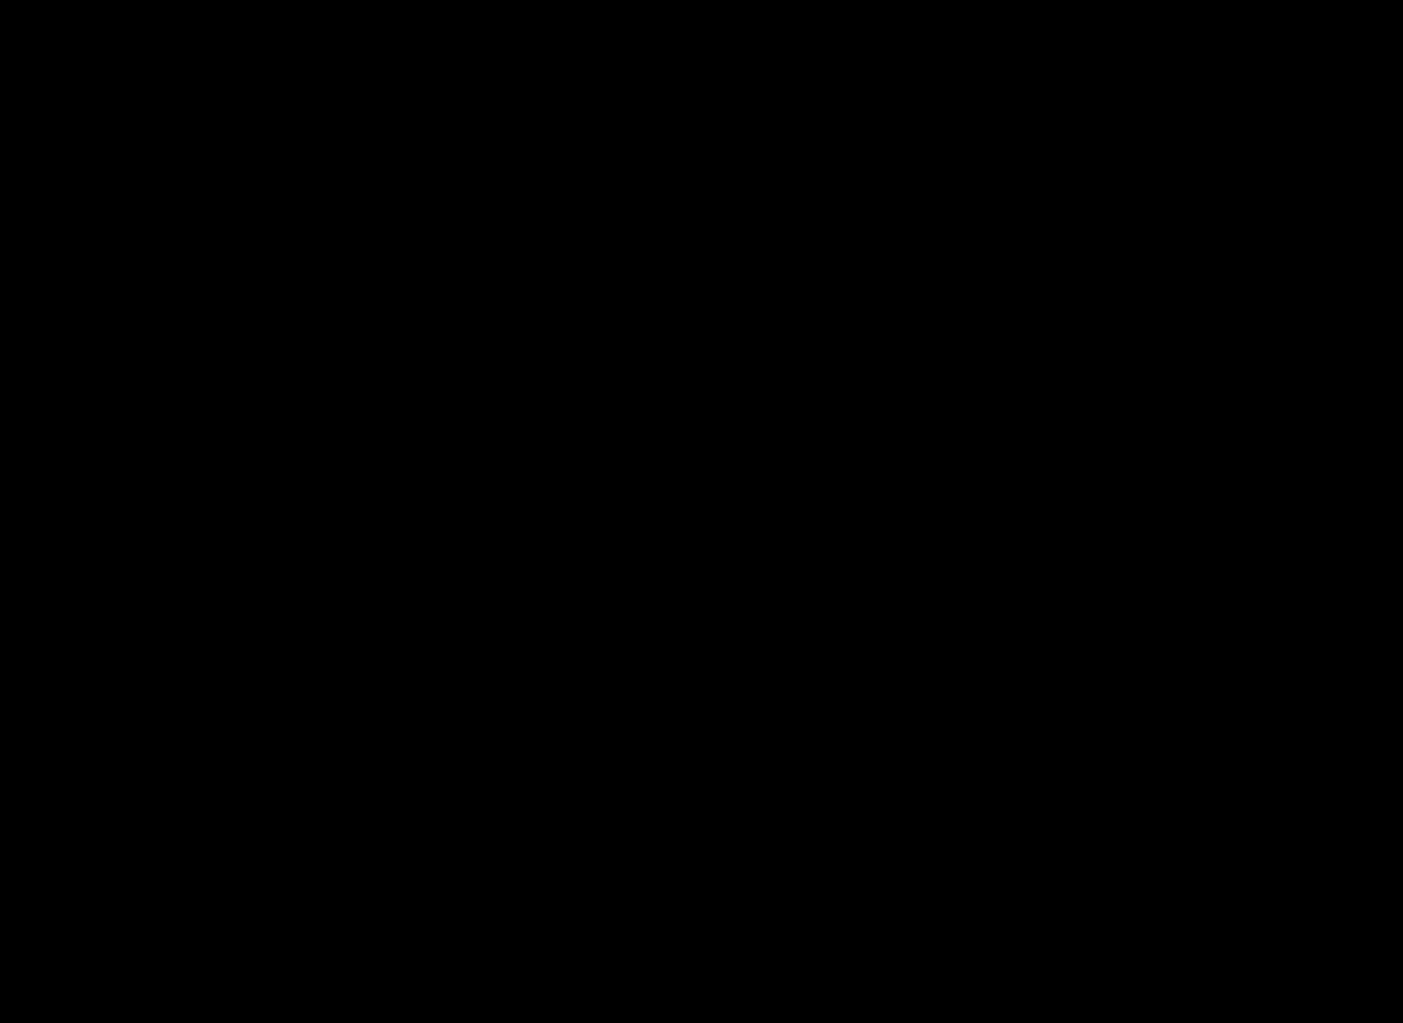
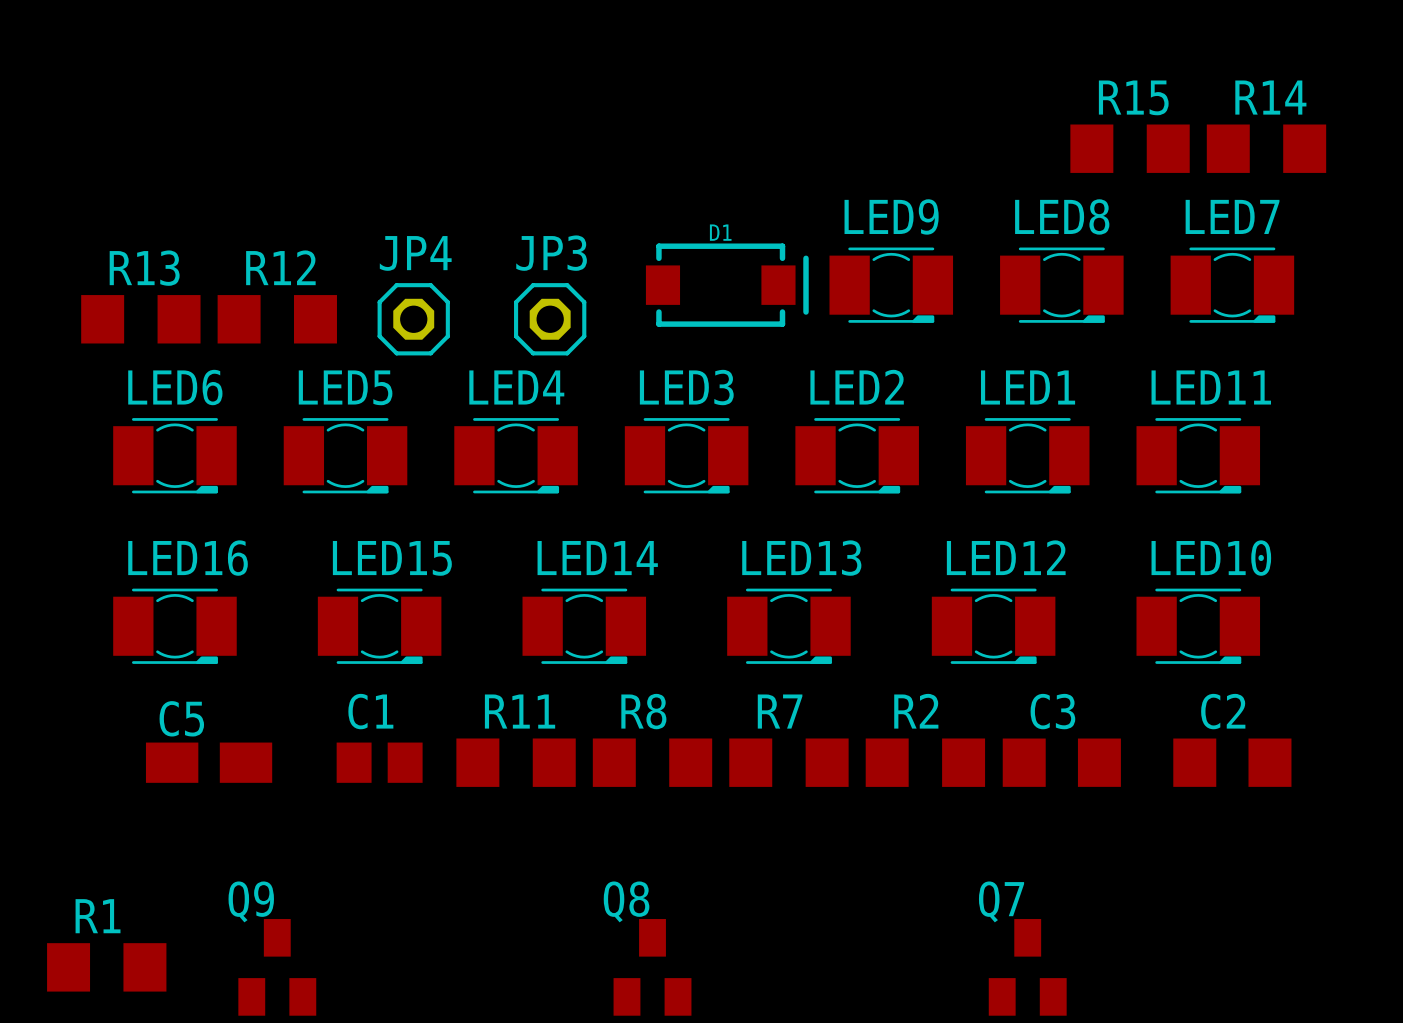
R15: none -> (1130, 148)
R14: none -> (1266, 148)
D1: none -> (727, 285)
LED9: none -> (891, 285)
LED8: none -> (1061, 285)
LED7: none -> (1232, 285)
R13: none -> (140, 319)
R12: none -> (277, 319)
JP4: none -> (413, 319)
JP3: none -> (550, 319)
LED6: none -> (174, 455)
LED5: none -> (345, 455)
LED4: none -> (516, 455)
LED3: none -> (686, 455)
LED2: none -> (857, 455)
LED1: none -> (1027, 455)
LED11: none -> (1198, 455)
LED16: none -> (174, 626)
LED15: none -> (379, 626)
LED14: none -> (584, 626)
LED13: none -> (788, 626)
LED12: none -> (993, 626)
LED10: none -> (1198, 626)
C5: none -> (209, 762)
C1: none -> (379, 762)
R11: none -> (516, 762)
R8: none -> (652, 762)
R7: none -> (788, 762)
R2: none -> (925, 762)
C3: none -> (1061, 762)
C2: none -> (1232, 762)
R1: none -> (106, 967)
Q9: none -> (277, 967)
Q8: none -> (652, 967)
Q7: none -> (1027, 967)

